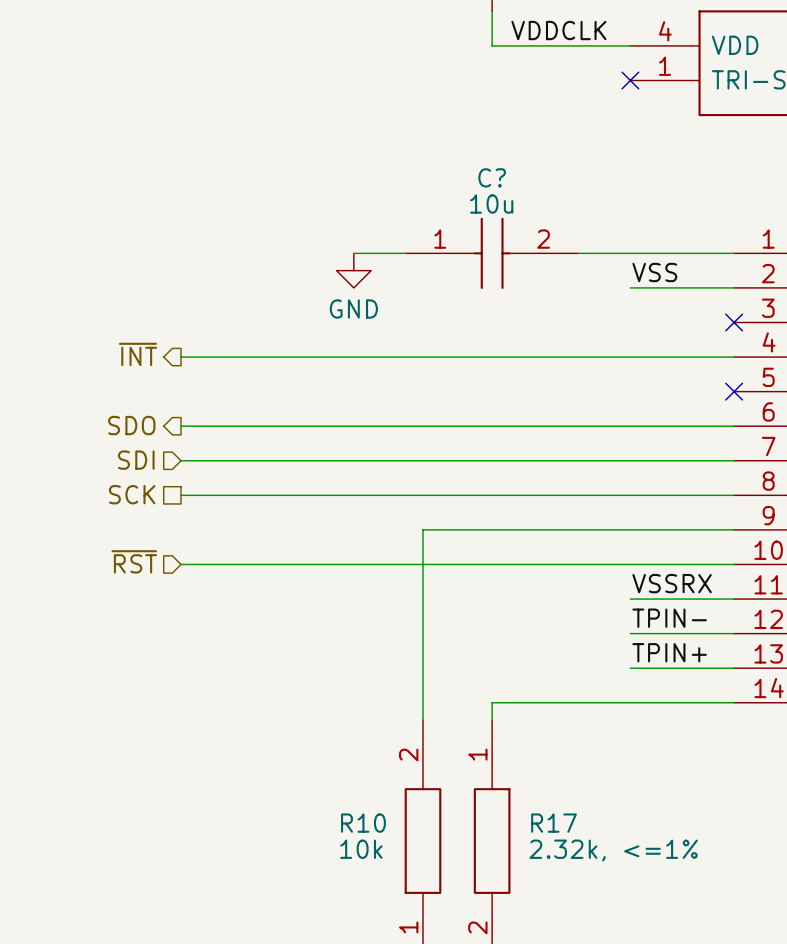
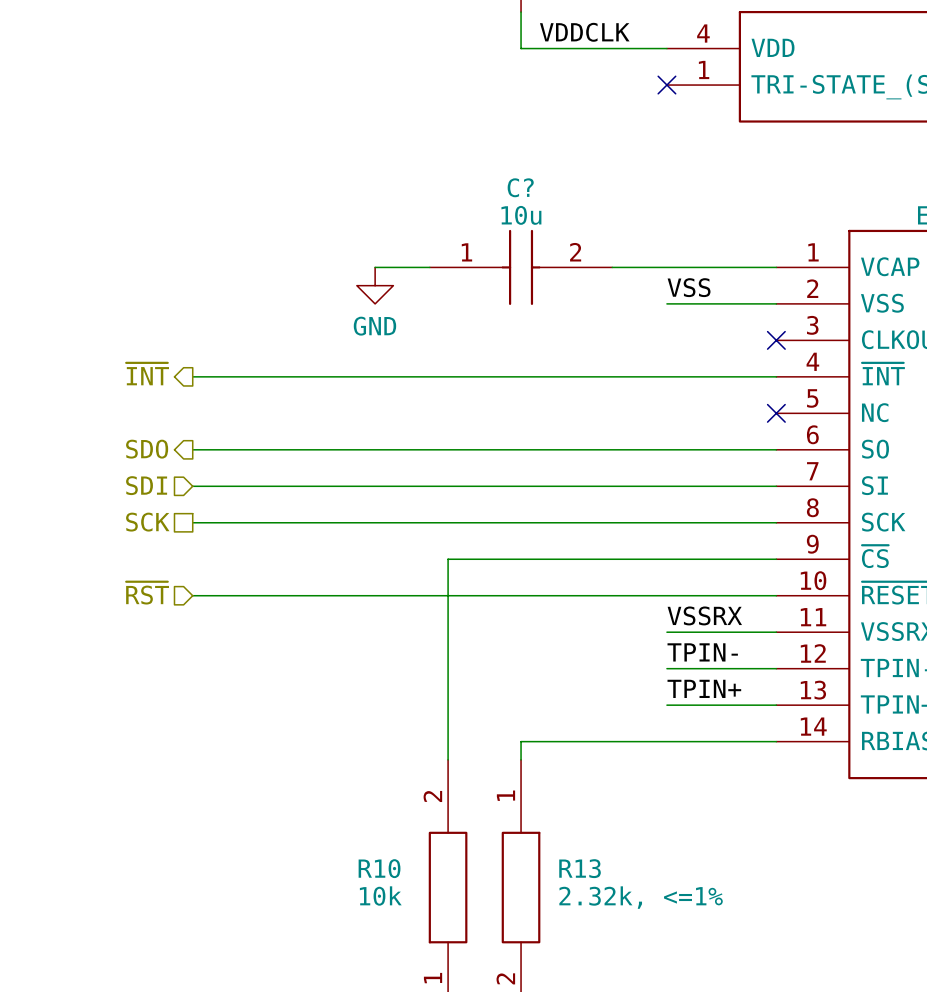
R17 name: R17 (553, 823) -> R13 (580, 868)

